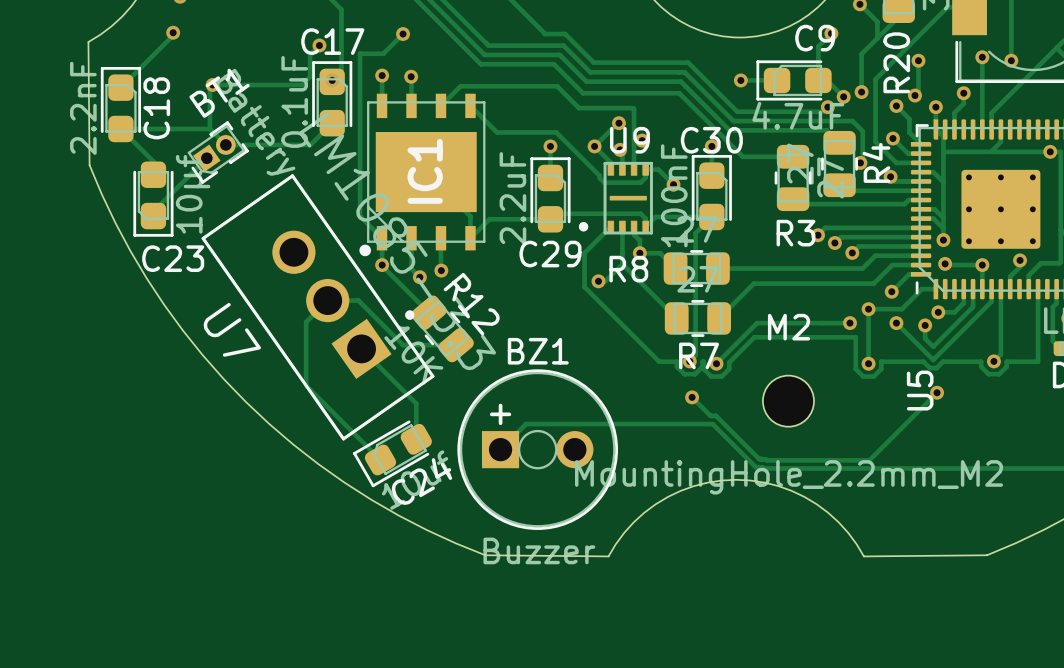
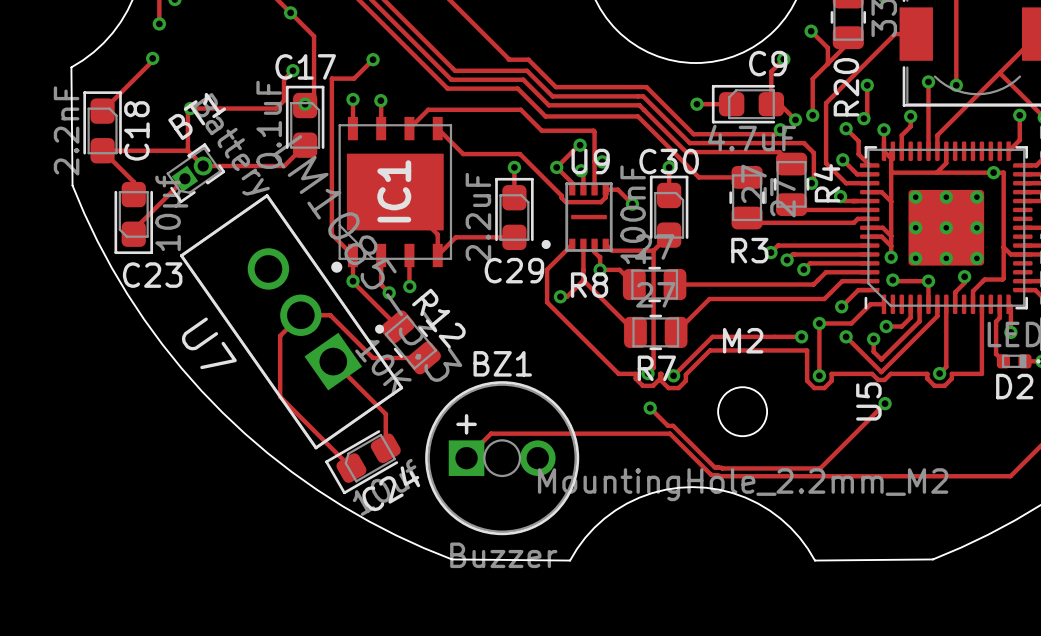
track: (556, 213) (640, 213) (645, 218) (645, 226) (655, 216) (711, 216) -> none
track: none -> (605, 244) (611, 250) (653, 250)

